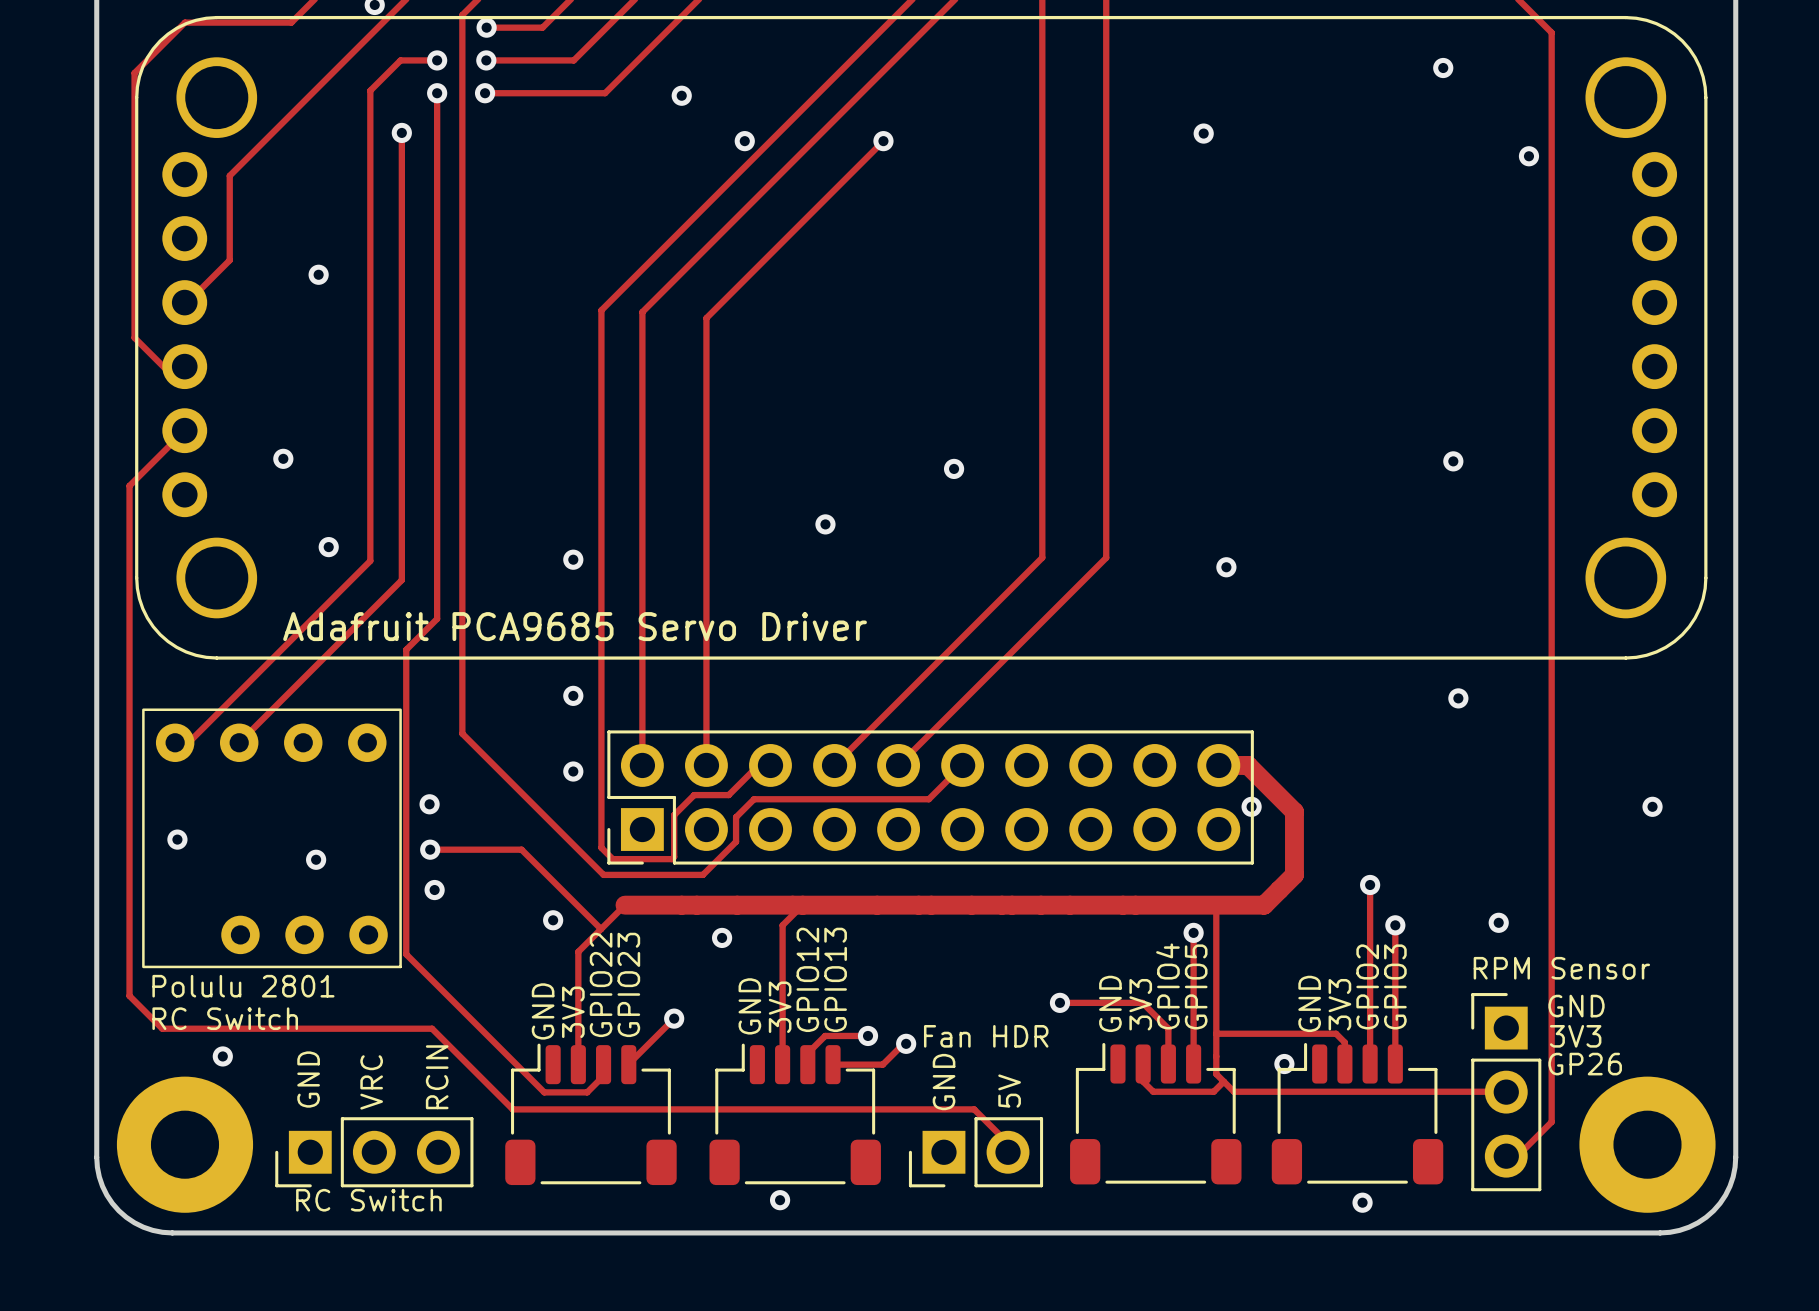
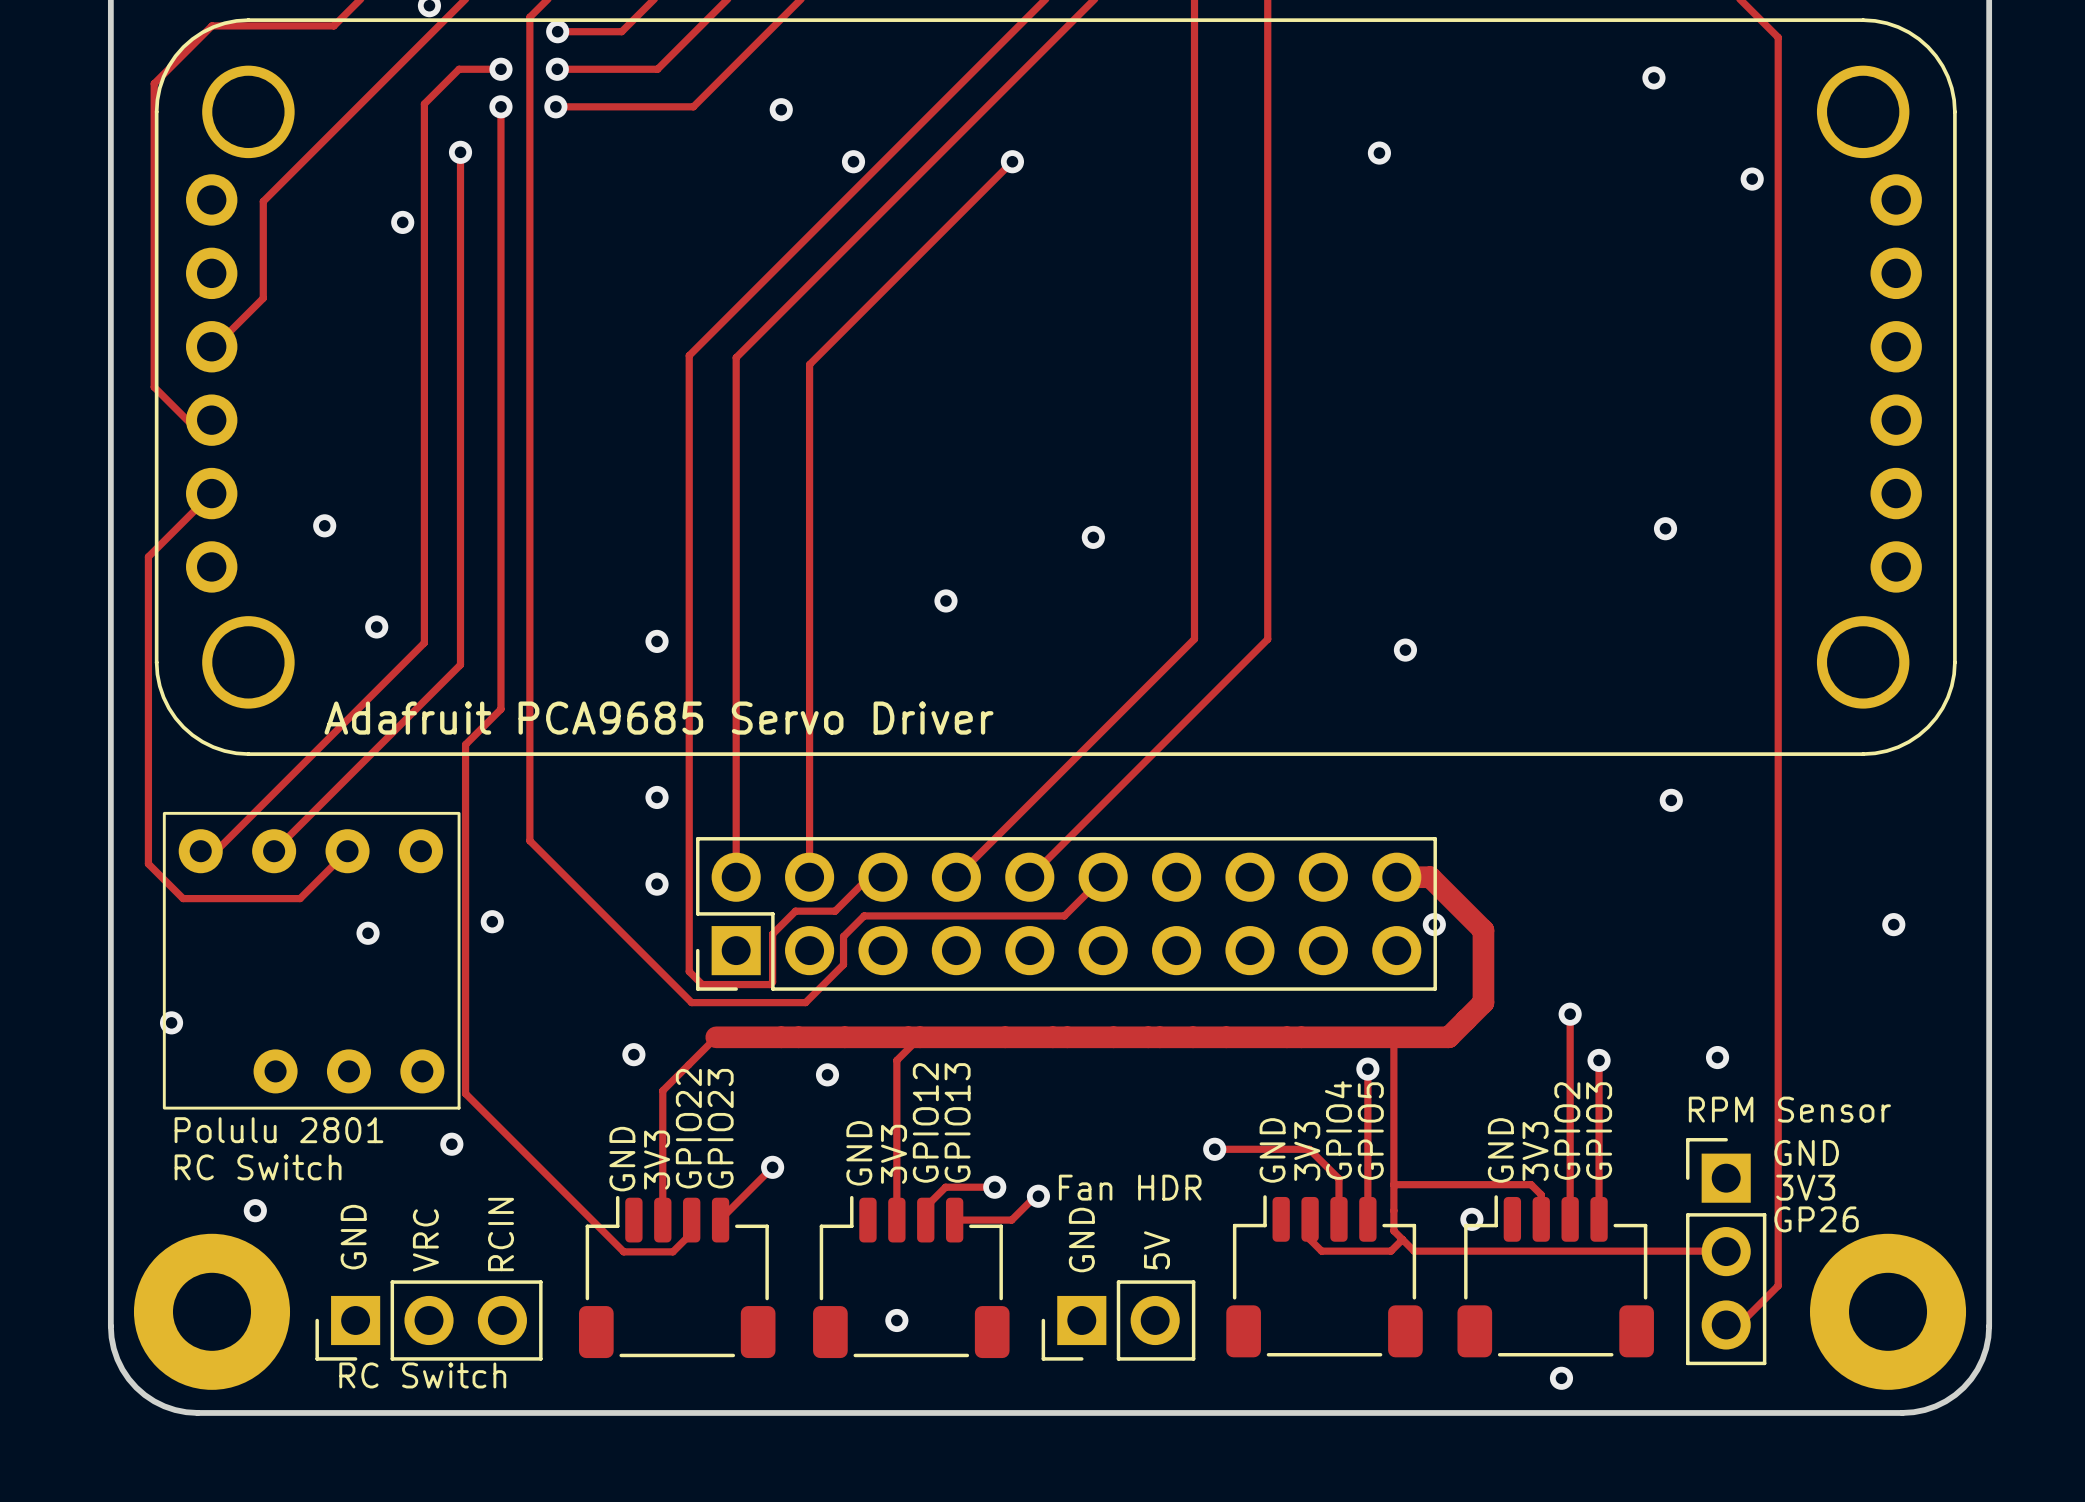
via position: (318, 274) -> (402, 222)
track: (129, 753) (129, 995) (162, 1028) (432, 1028) (512, 1109) (974, 1109) (1008, 1143) -> (148, 863) (183, 898) (300, 898) (347, 851)
via position: (177, 839) -> (171, 1022)
track: (430, 849) (521, 849) (601, 929) -> none
via: (430, 849) -> none
via position: (316, 859) -> (368, 933)
via: (434, 890) -> none
via: none -> (451, 1144)
via position: (780, 1200) -> (896, 1320)

